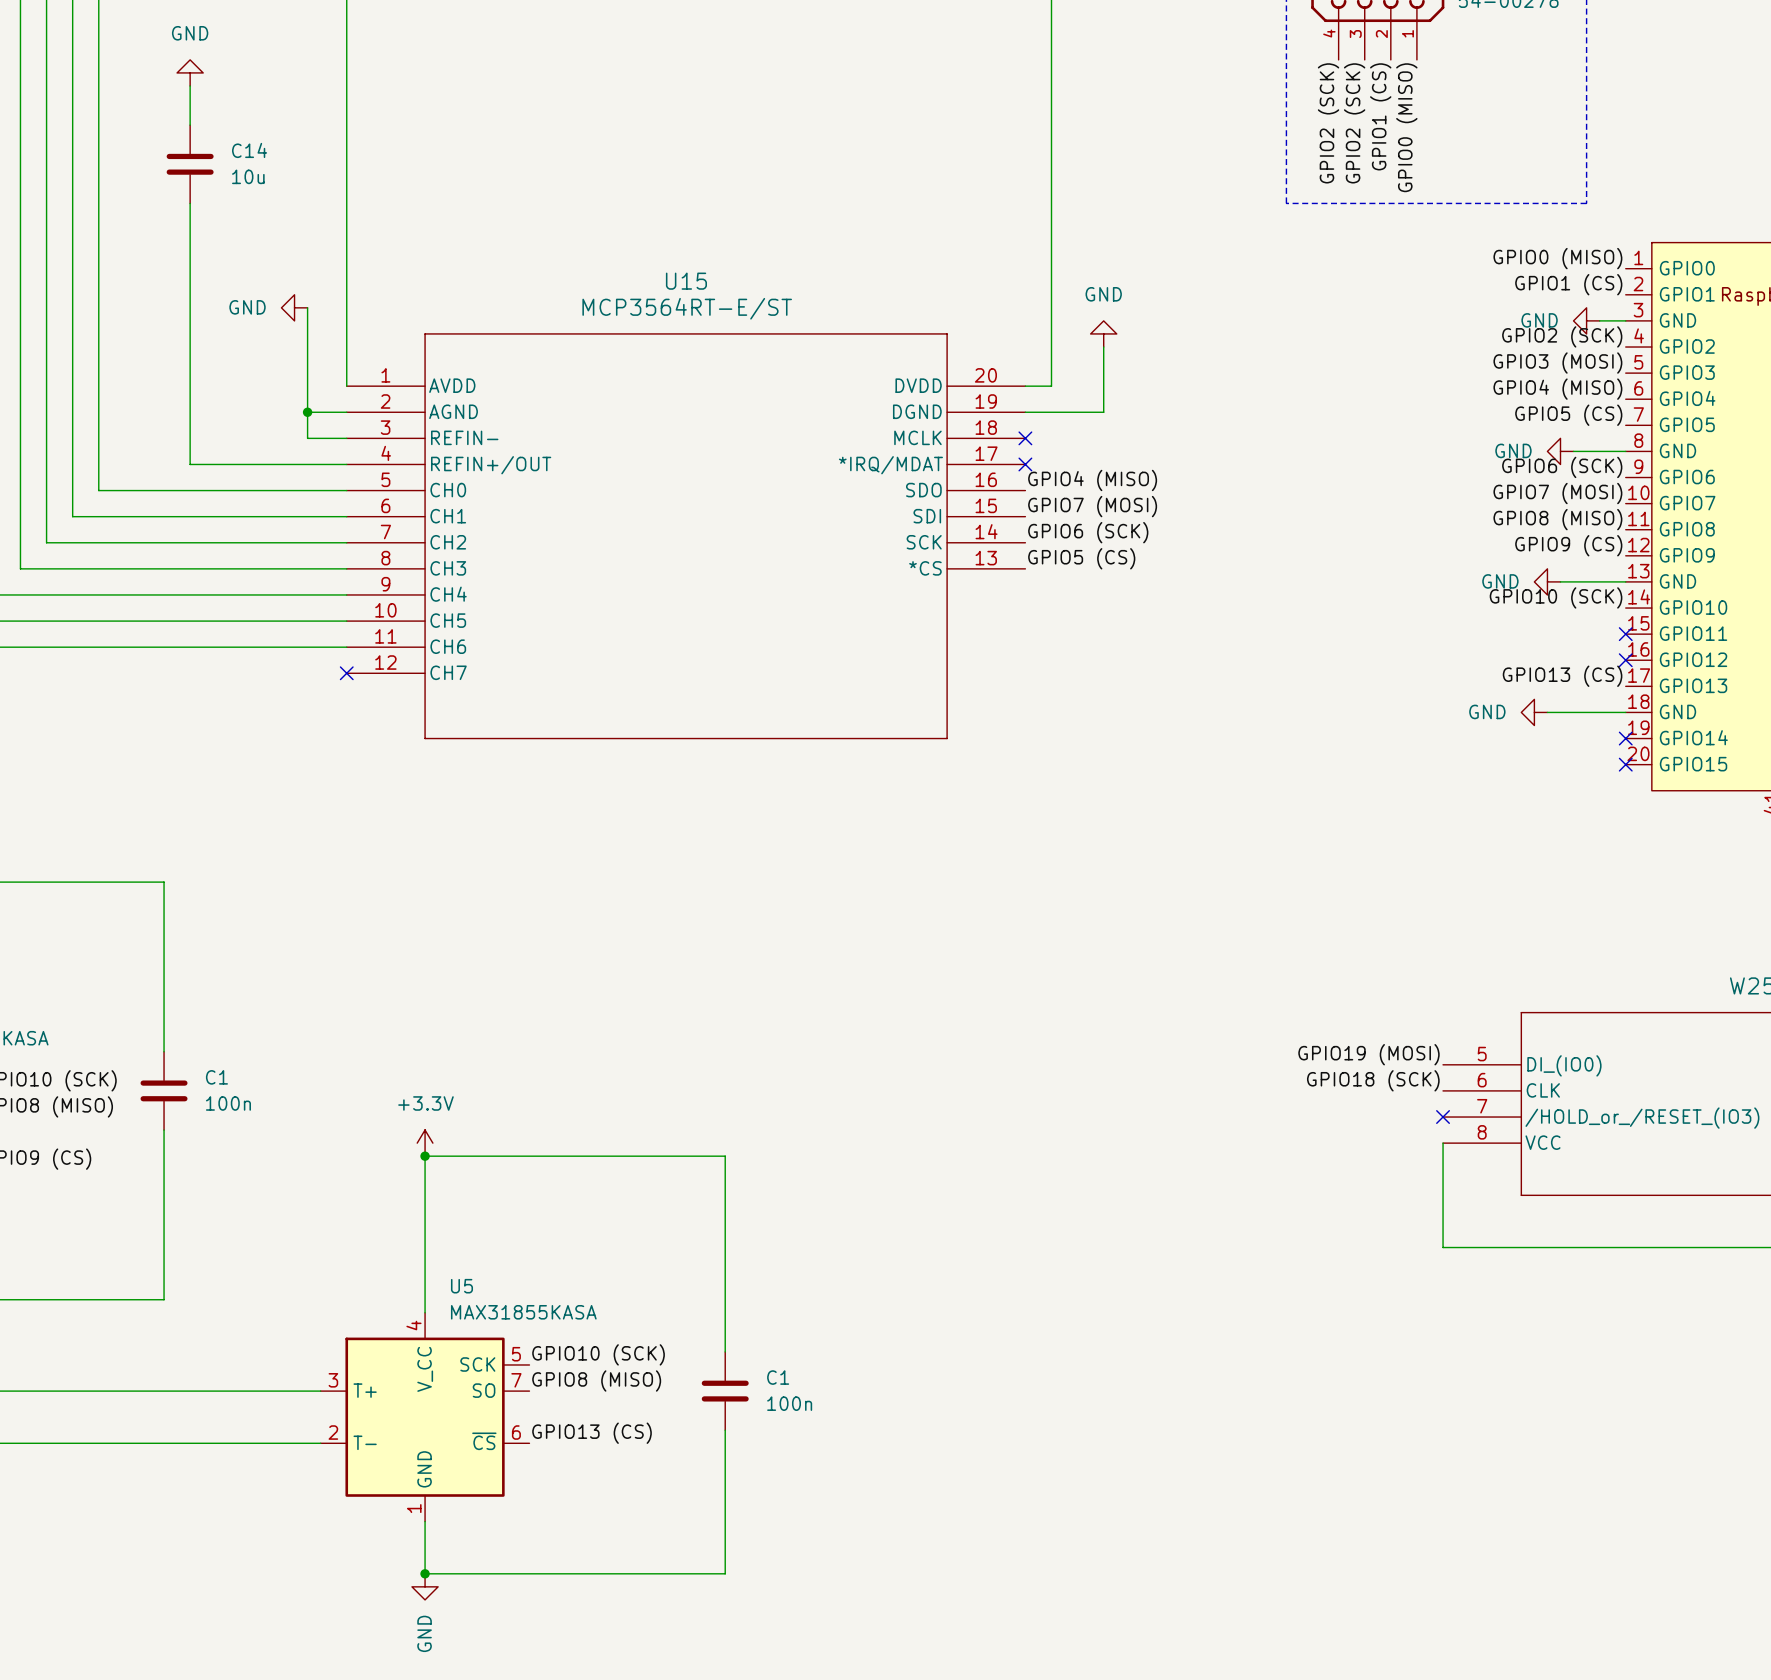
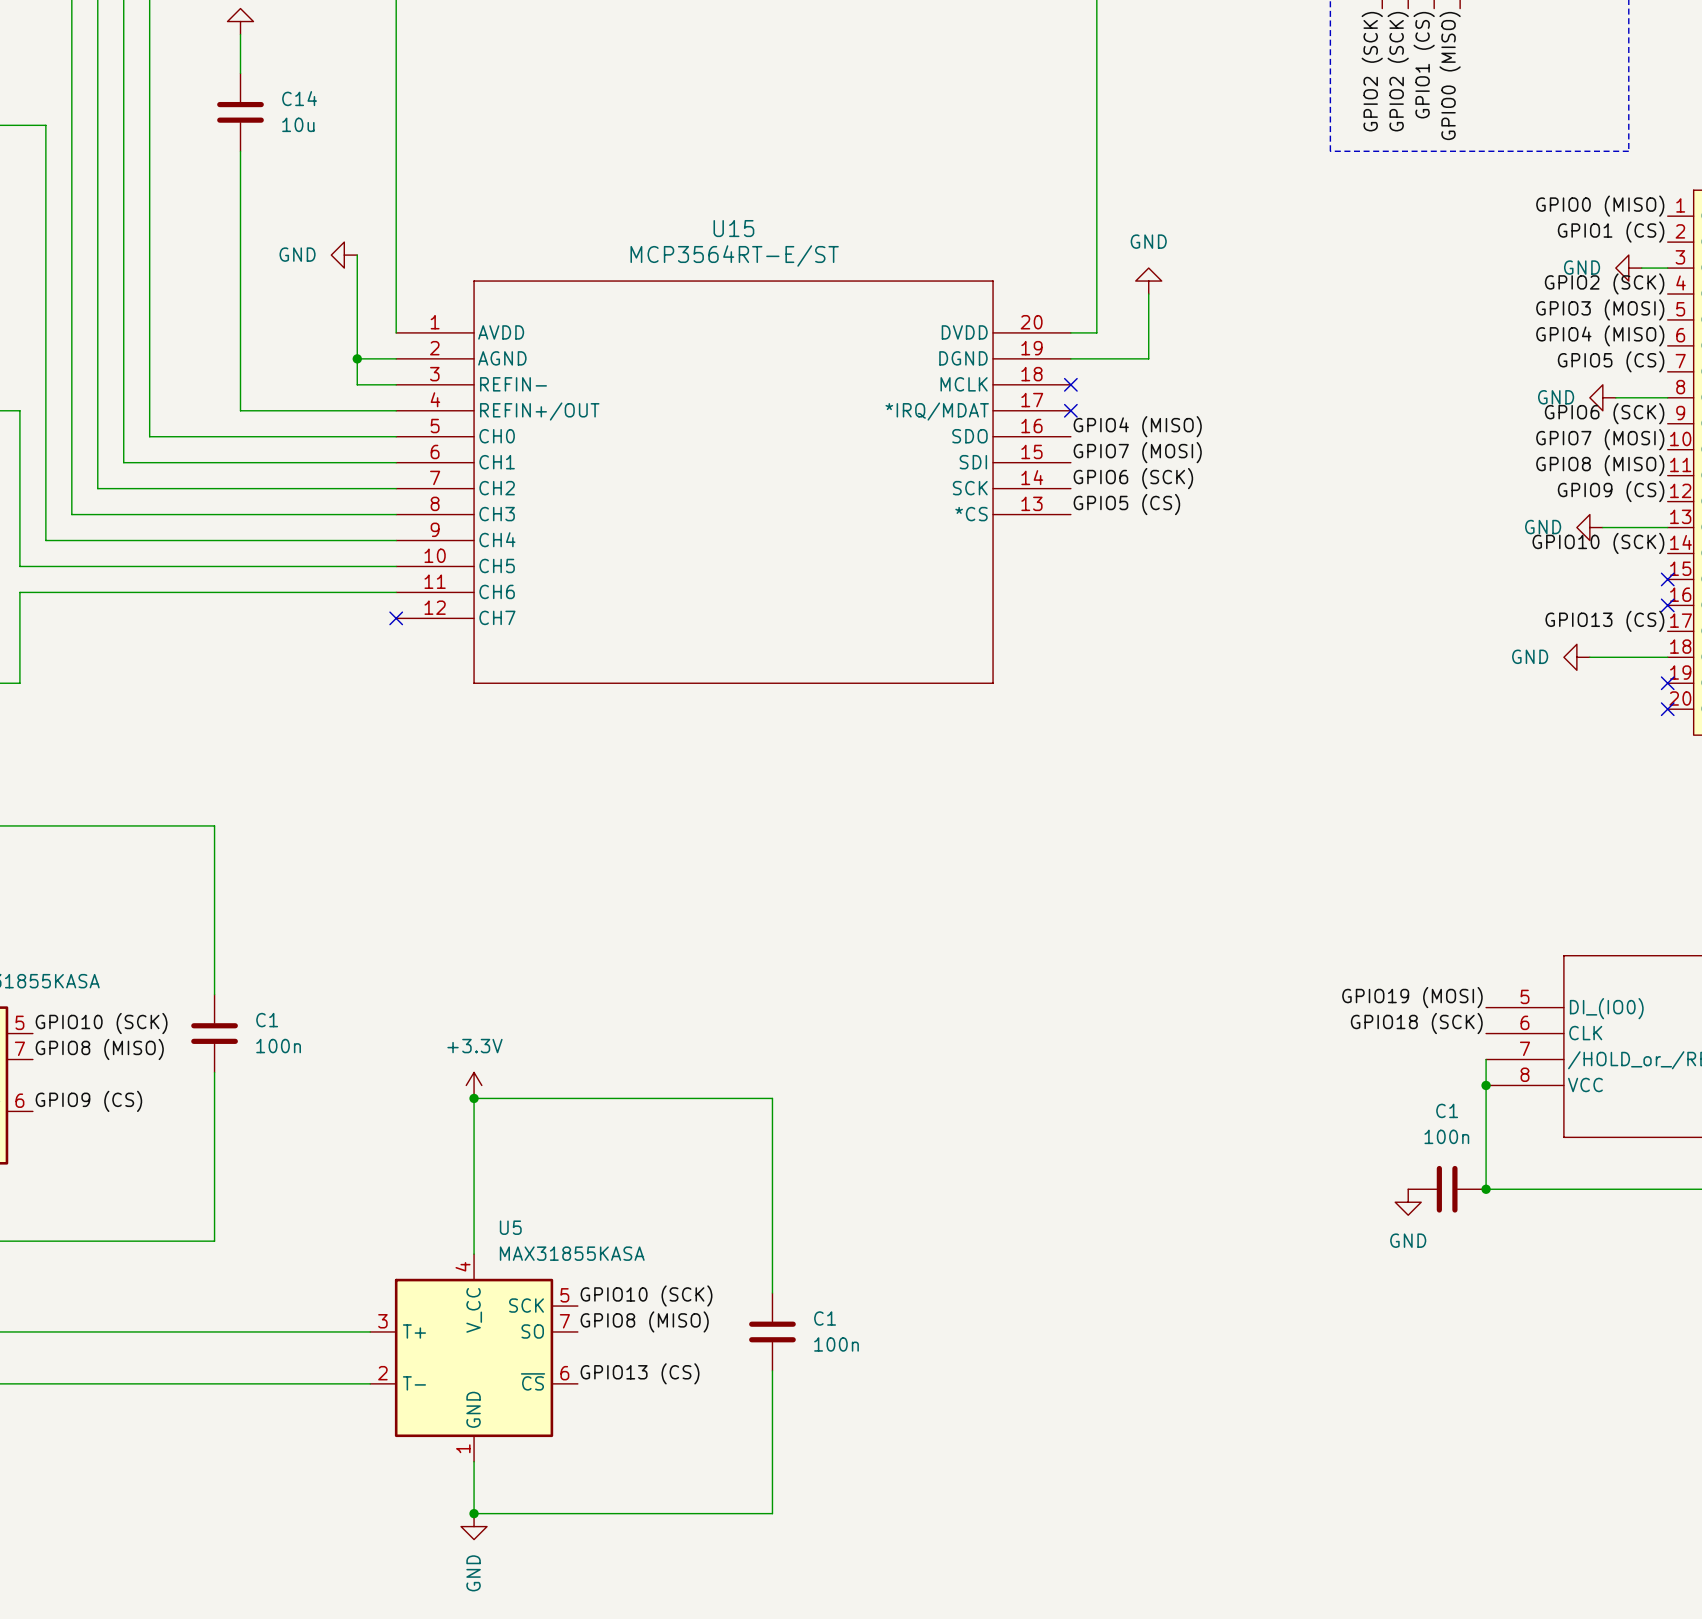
wire: none -> (1486, 1059) (1486, 1085)
no-connect mark: (1443, 1117) -> none
junction: none -> (1486, 1085)
C1: none -> 100n (1447, 1189)
junction: none -> (1486, 1189)
power symbol: none -> GND (1408, 1202)

